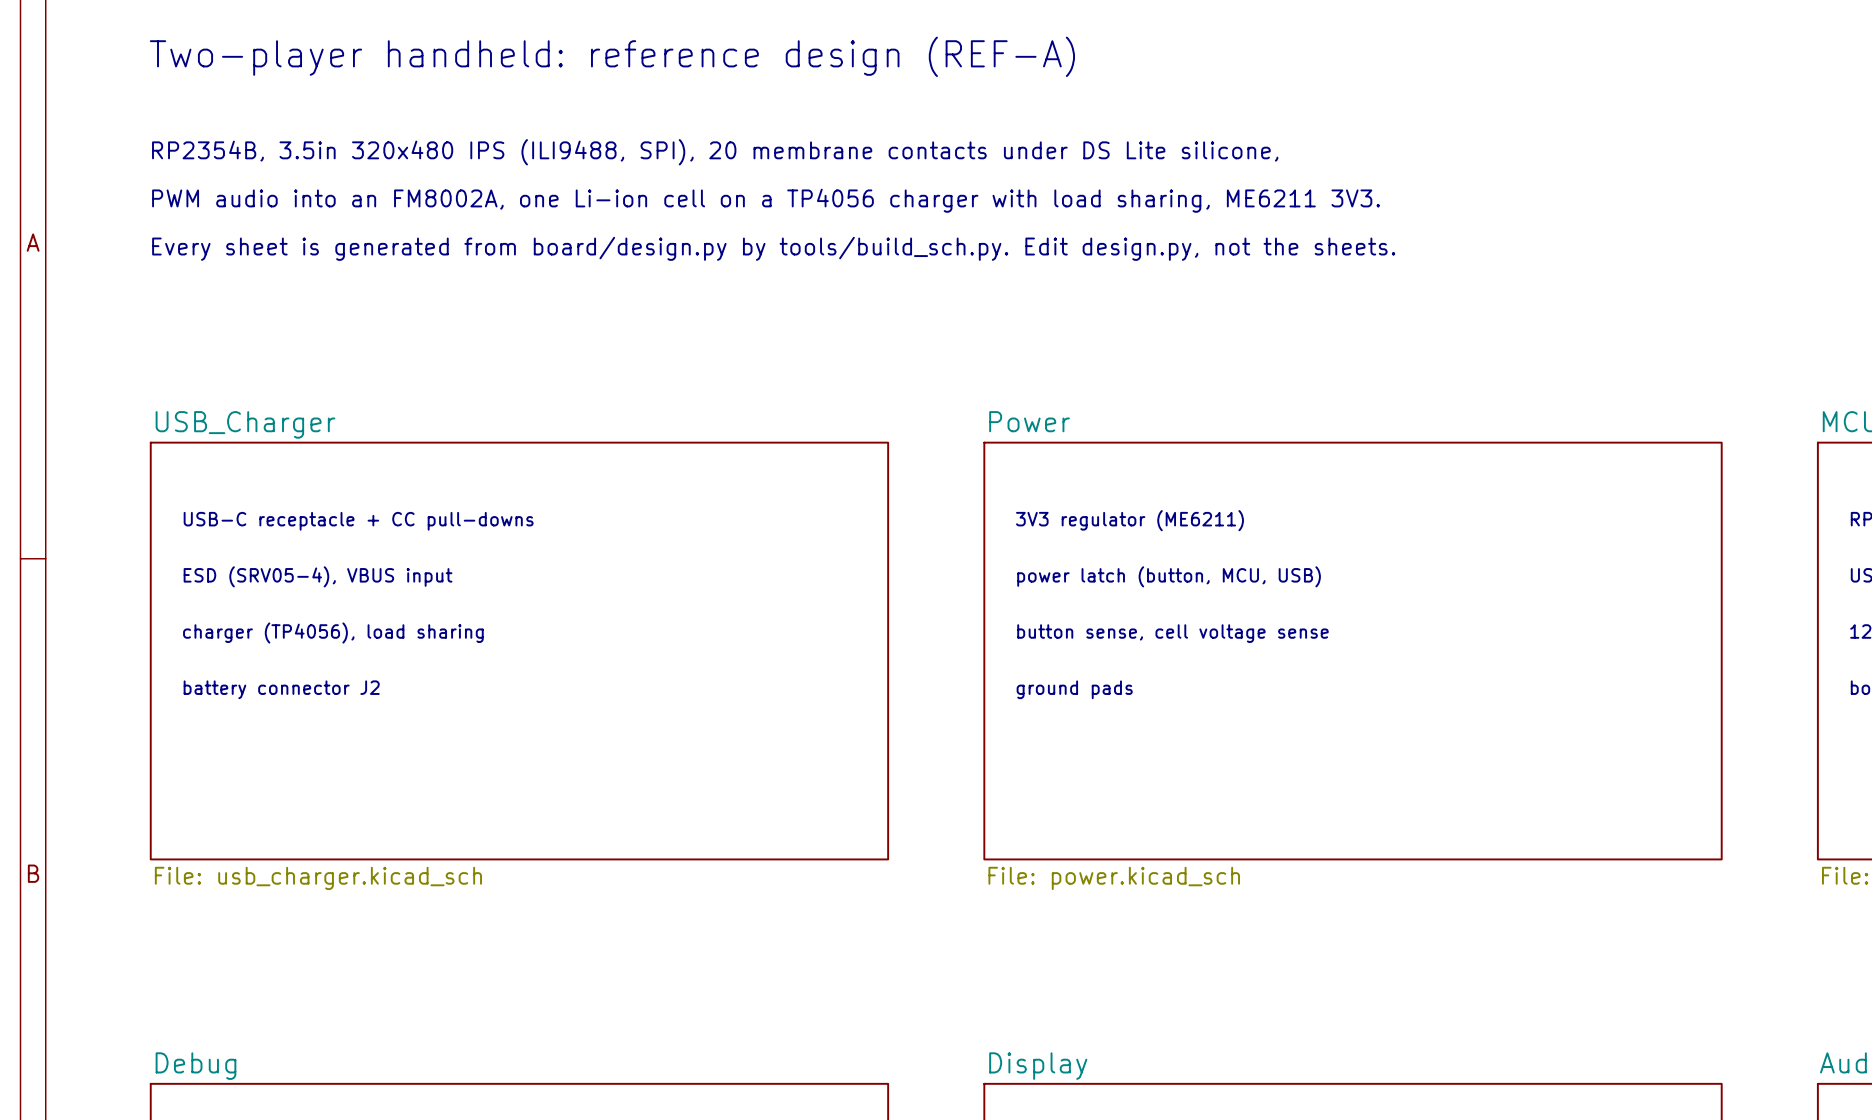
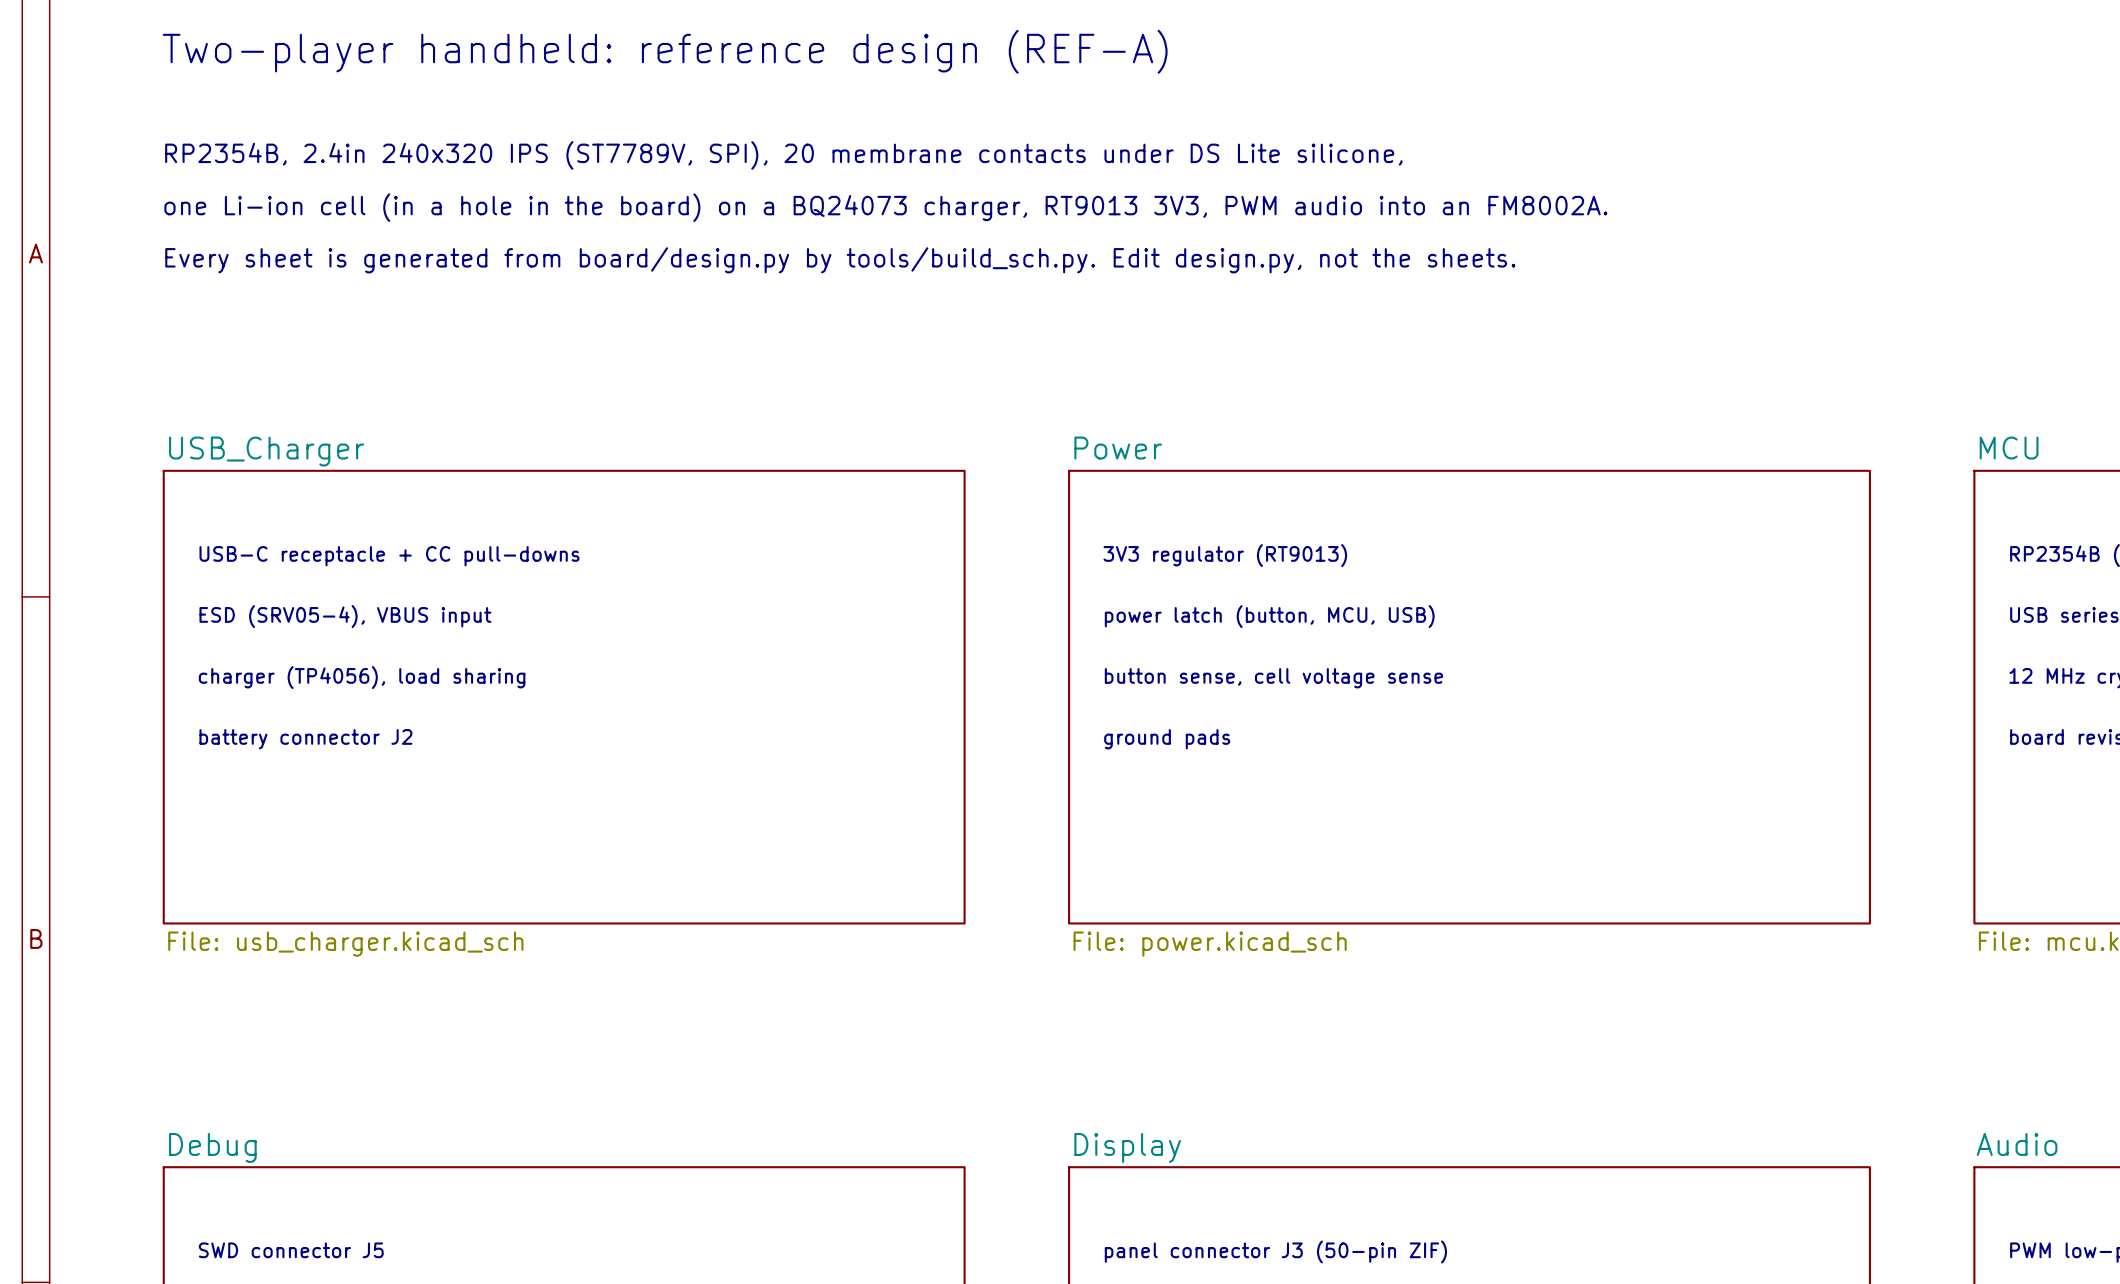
text: RP2354B, 3.5in 320x480 IPS (ILI9488, SPI), 20 membrane contacts under DS Lite silicone, (715, 152) -> RP2354B, 2.4in 240x320 IPS (ST7789V, SPI), 20 membrane contacts under DS Lite silicone, (783, 155)
text: PWM audio into an FM8002A, one Li-ion cell on a TP4056 charger with load sharing, ME6211 3V3. (766, 200) -> none
text: none -> one Li-ion cell (in a hole in the board) on a BQ24073 charger, RT9013 3V3, PWM audio into an FM8002A. (885, 207)
text: 3V3 regulator (ME6211) (1129, 520) -> 3V3 regulator (RT9013) (1225, 555)

